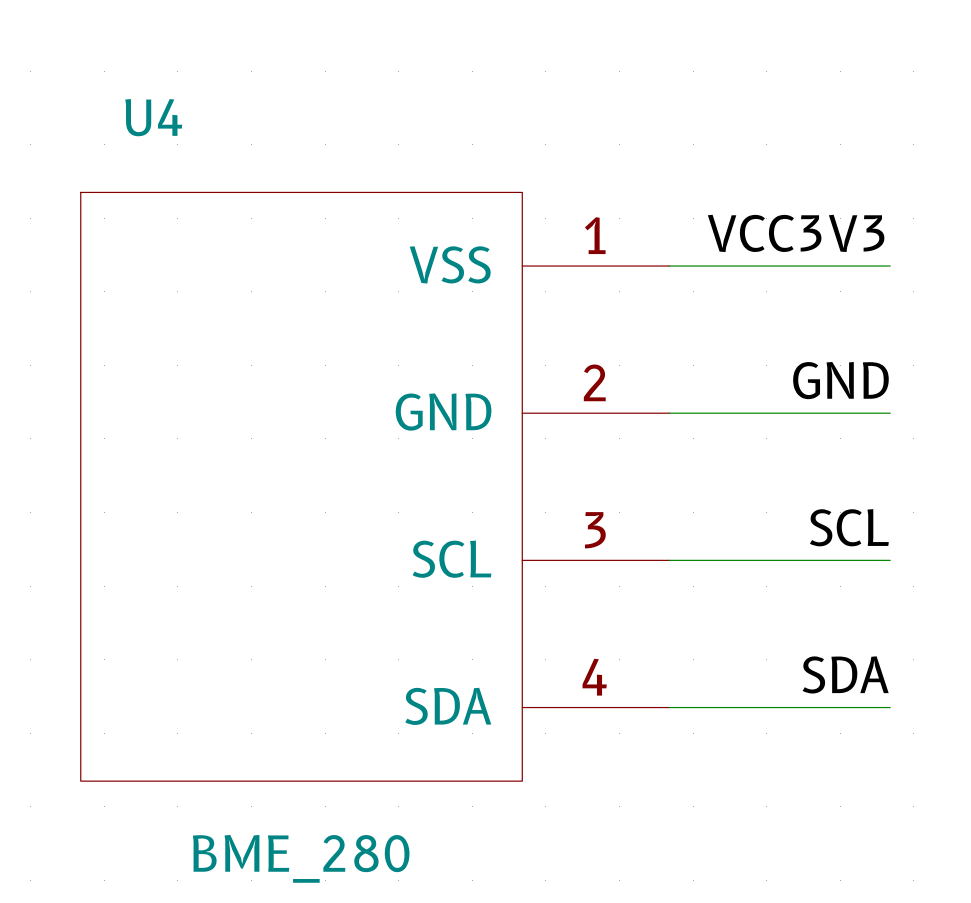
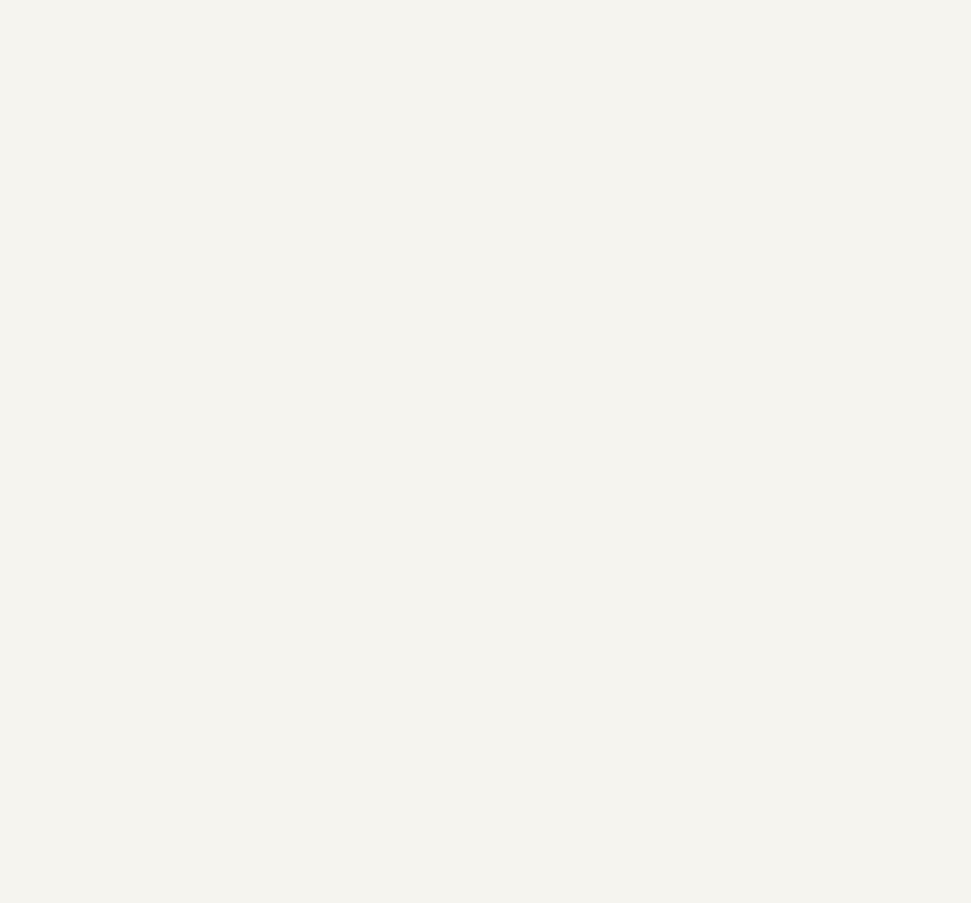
label: VCC3V3 (796, 233) -> none
wire: (669, 266) (890, 266) -> none
label: GND (840, 380) -> none
wire: (669, 413) (890, 413) -> none
U4: BME_280 (375, 486) -> none
label: SCL (849, 527) -> none
wire: (669, 560) (890, 560) -> none
label: SDA (845, 674) -> none
wire: (669, 707) (890, 707) -> none

